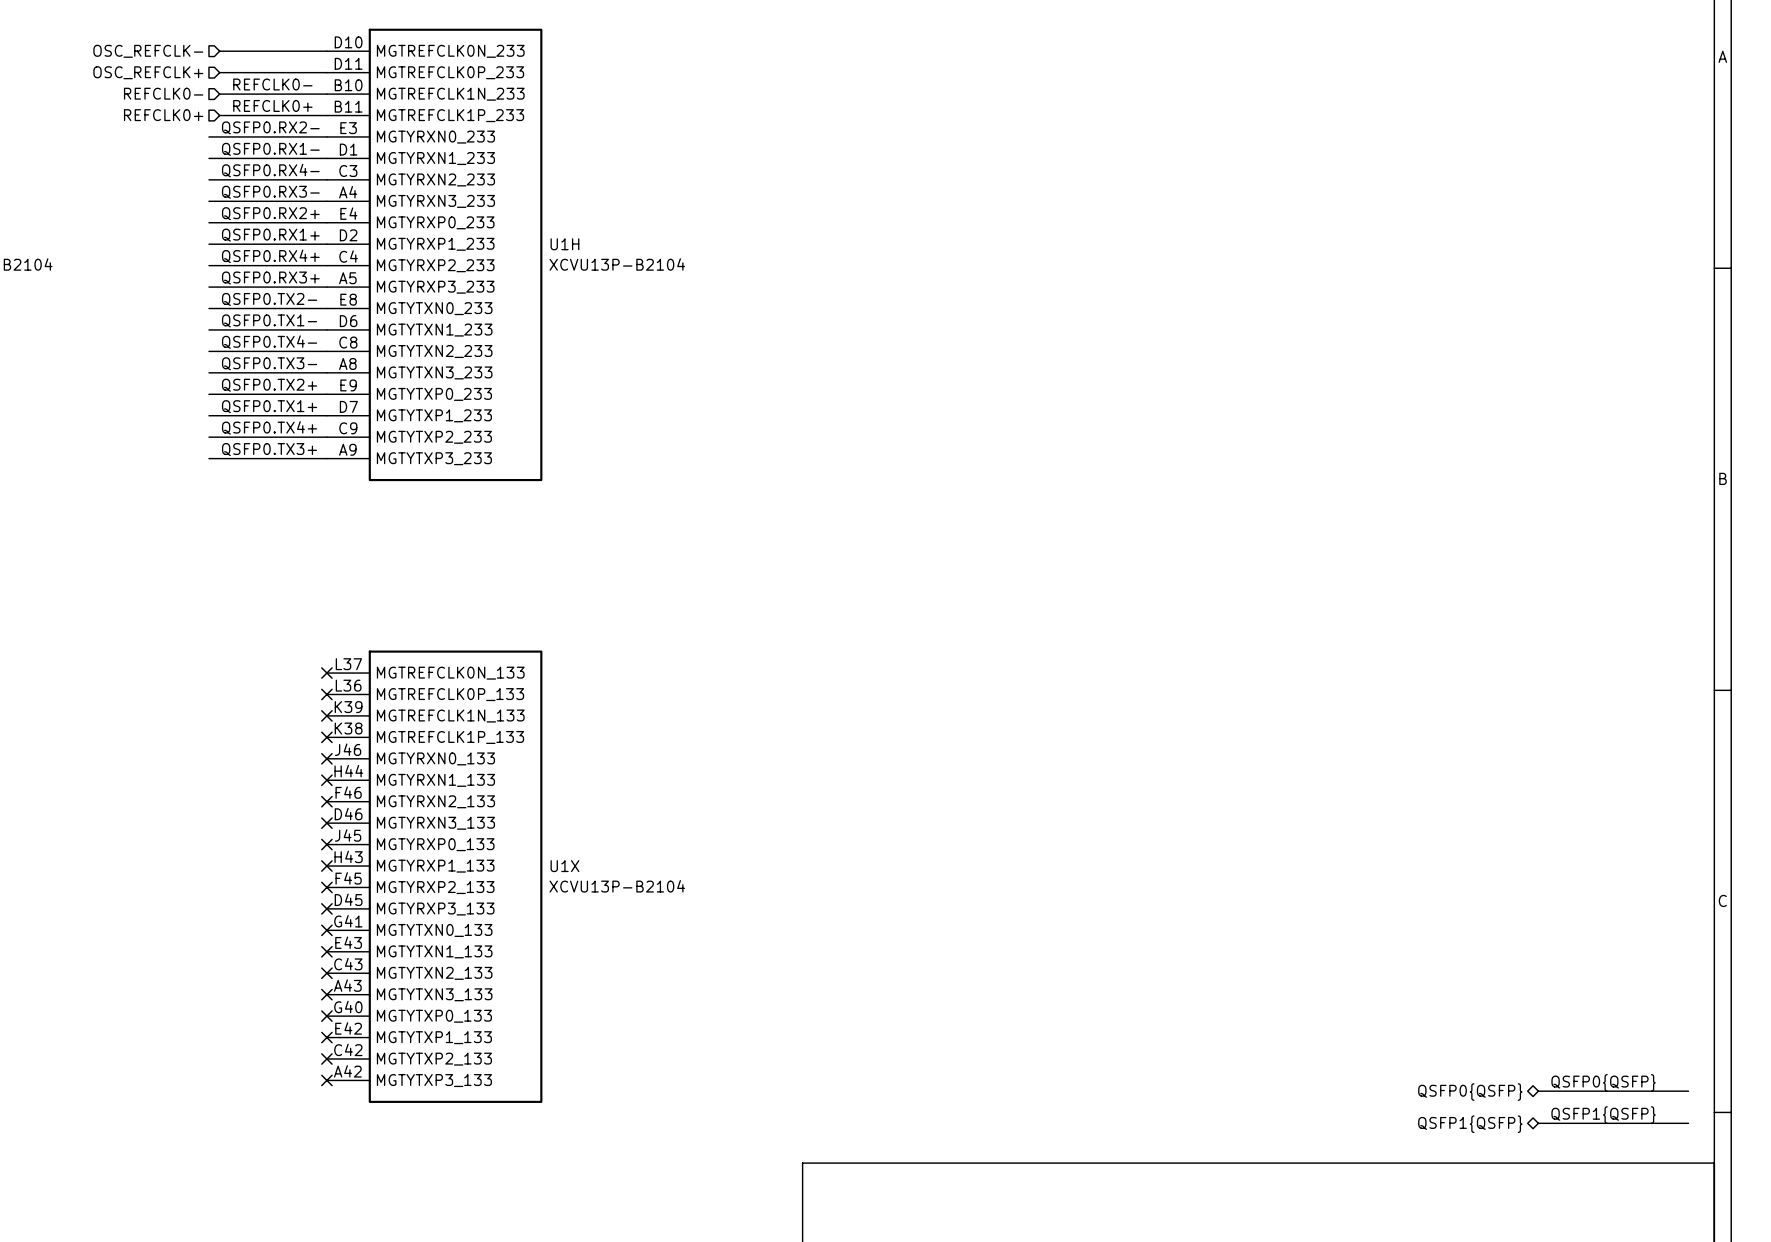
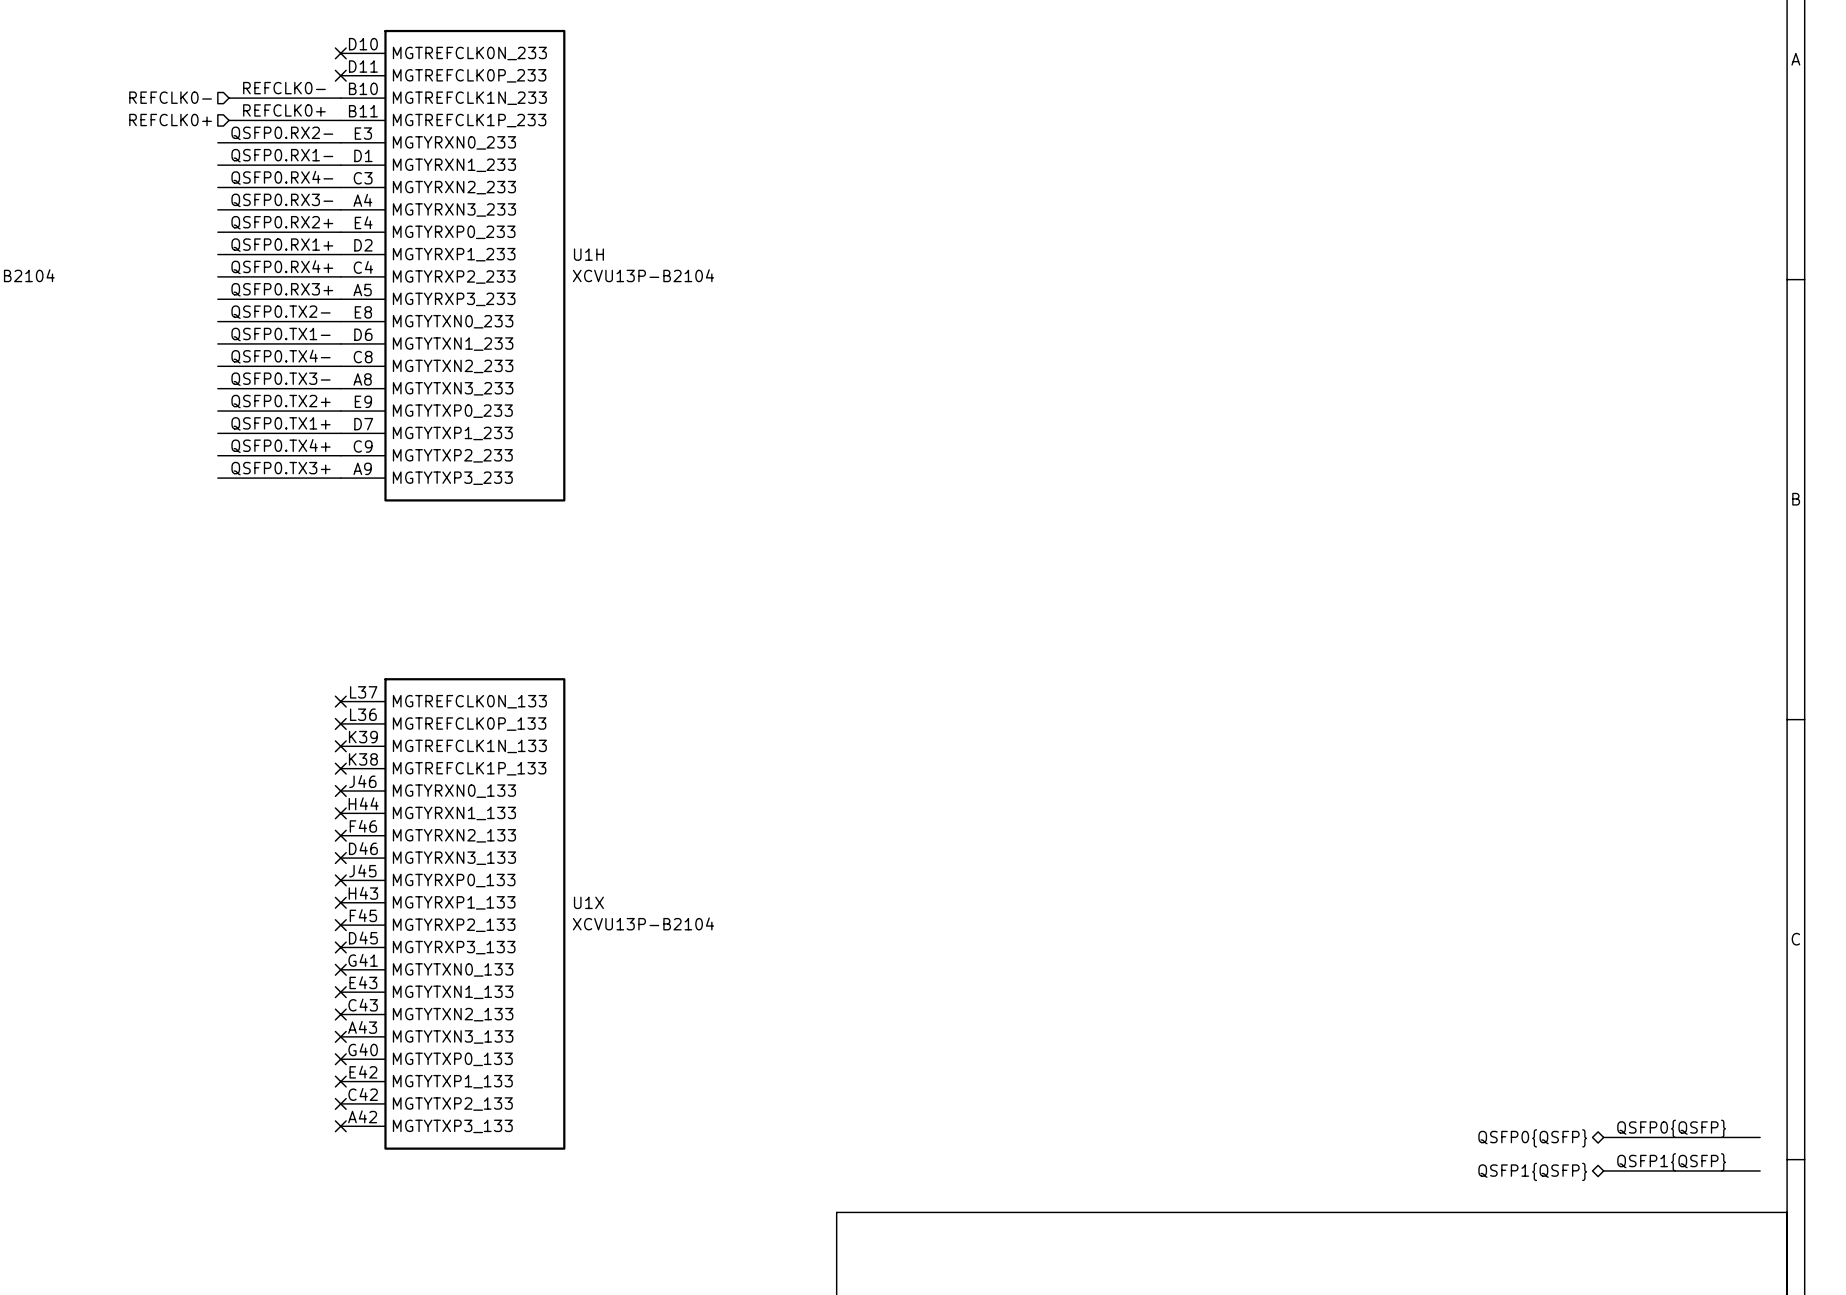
hierarchical label: OSC_REFCLK- (148, 51) -> none
wire: (219, 51) (326, 51) -> none
no-connect mark: none -> (340, 53)
hierarchical label: OSC_REFCLK+ (148, 72) -> none
wire: (219, 72) (326, 72) -> none
no-connect mark: none -> (340, 75)

